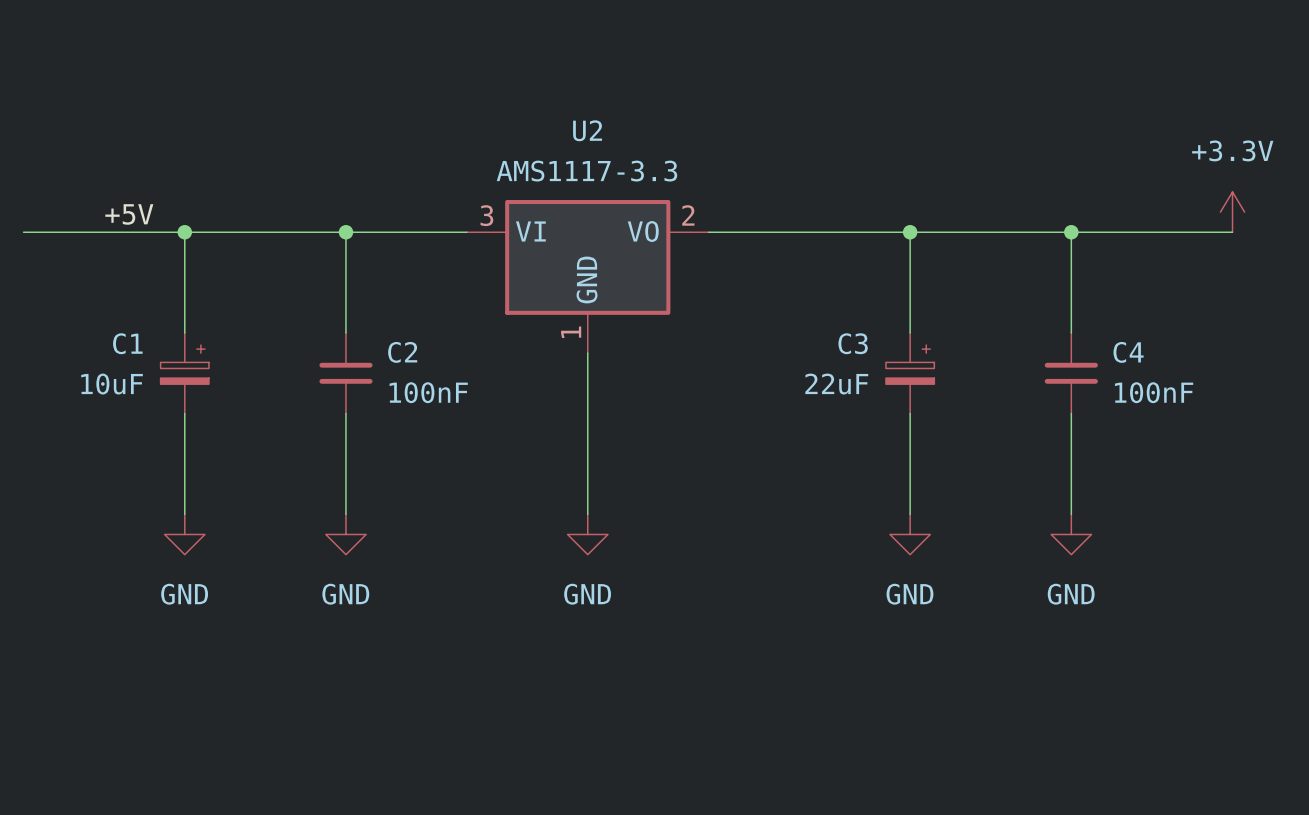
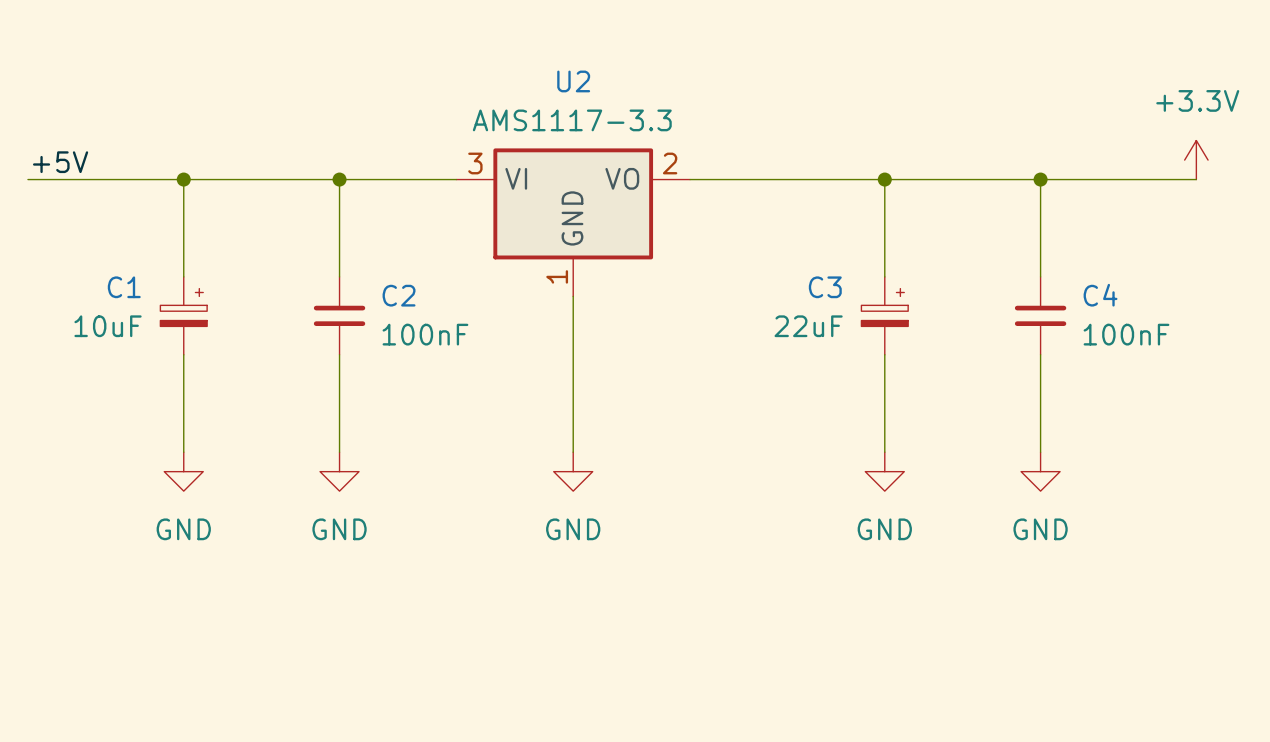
label position: +5V (129, 214) -> +5V (60, 162)

